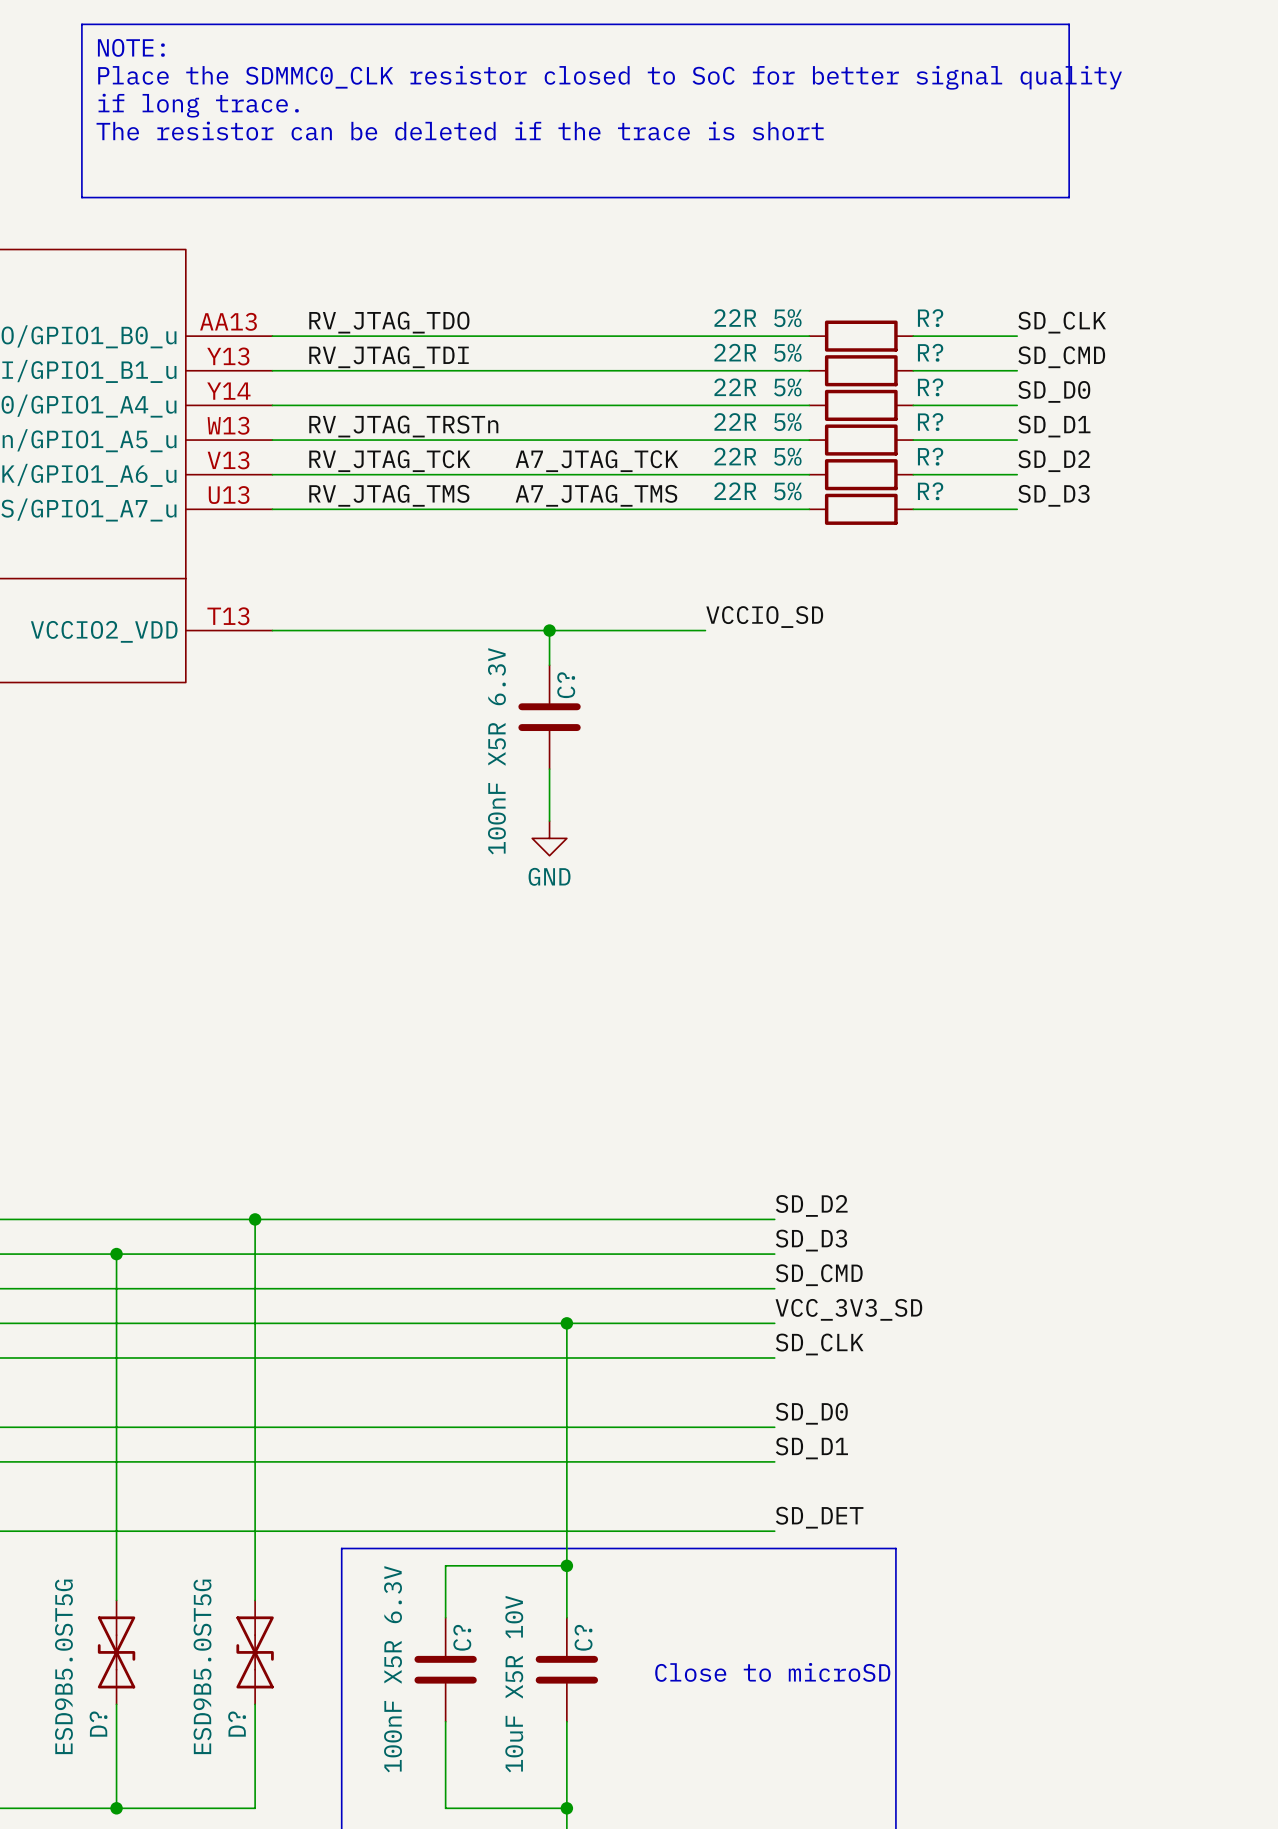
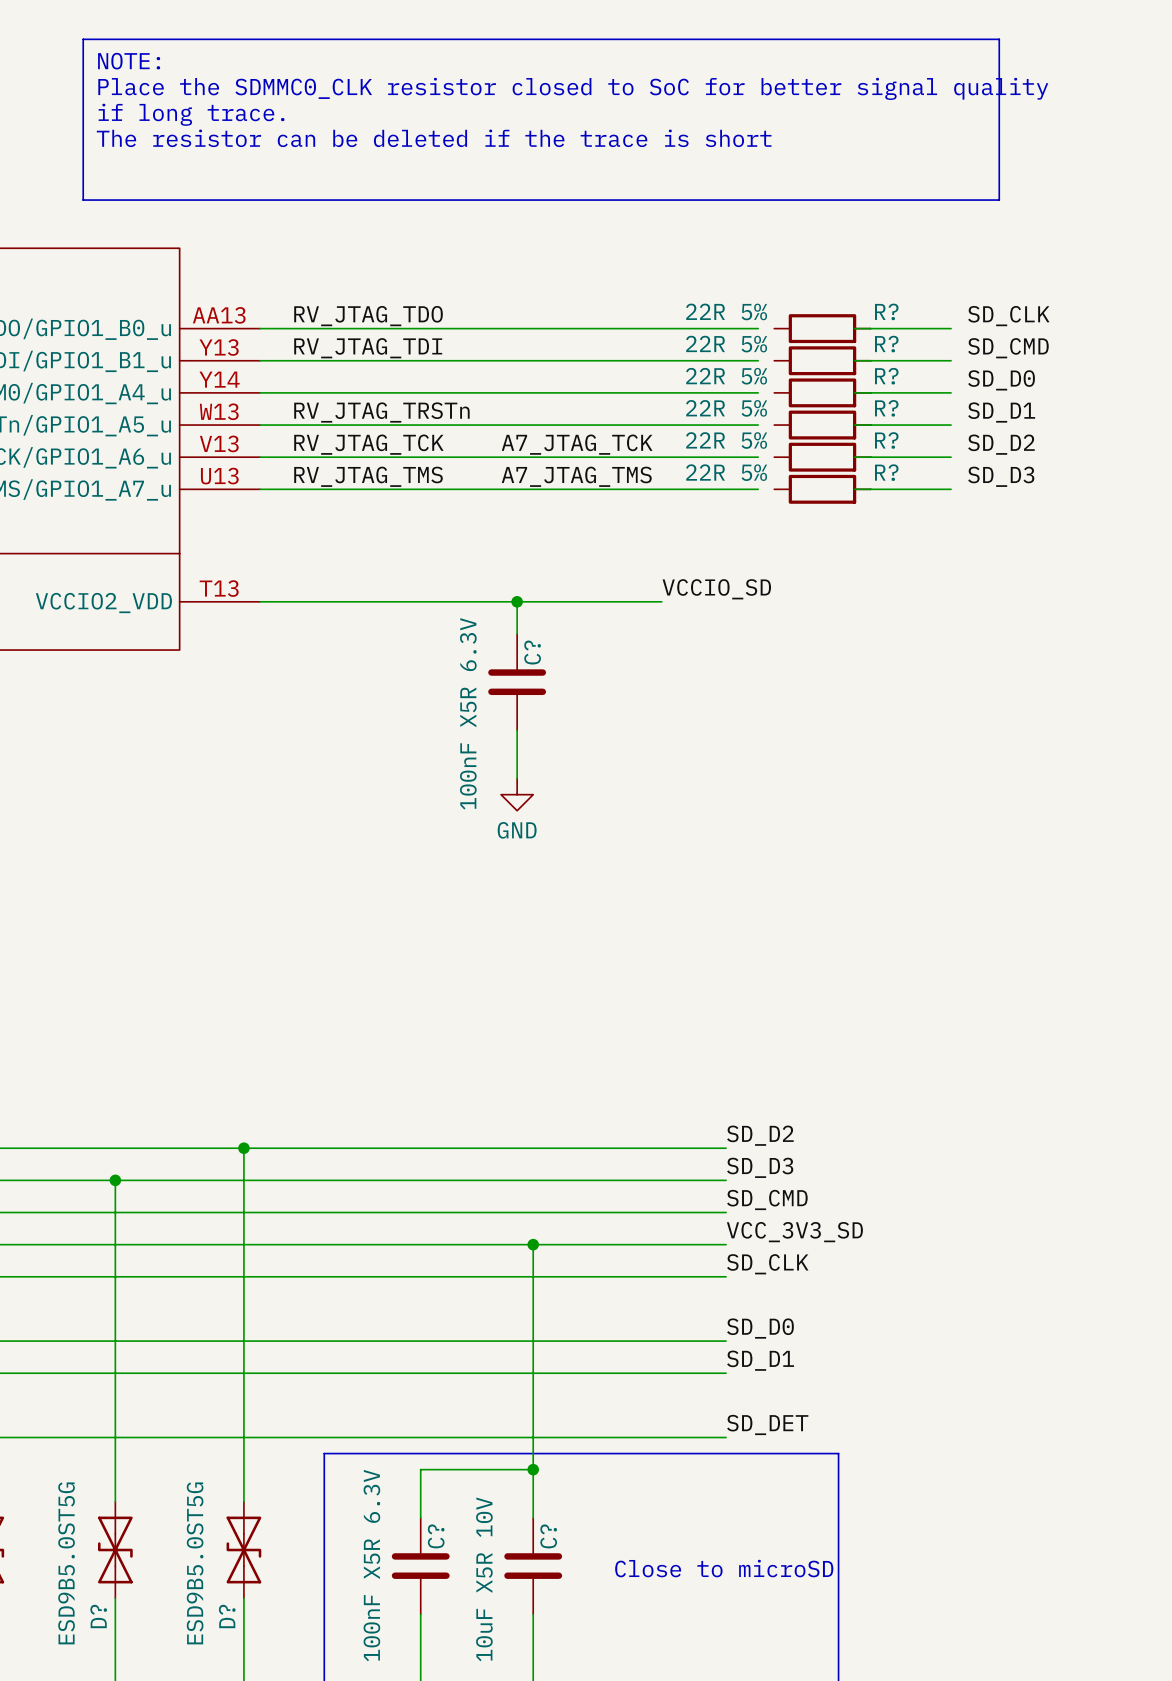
label position: SD_CLK (1062, 322) -> SD_CLK (1008, 316)
R? position: (861, 336) -> (822, 328)
label position: SD_CMD (1061, 357) -> SD_CMD (1008, 348)
R? position: (861, 370) -> (822, 360)
label position: SD_D0 (1054, 391) -> SD_D0 (1001, 380)
R? position: (861, 405) -> (822, 392)
label position: SD_D1 (1054, 426) -> SD_D1 (1001, 412)
R? position: (861, 440) -> (822, 425)
label position: A7_JTAG_TCK (596, 461) -> A7_JTAG_TCK (577, 444)
label position: SD_D2 (1054, 461) -> SD_D2 (1001, 444)
R? position: (861, 474) -> (822, 457)
label position: A7_JTAG_TMS (596, 495) -> A7_JTAG_TMS (576, 476)
label position: SD_D3 (1053, 495) -> SD_D3 (1001, 476)
R? position: (861, 509) -> (822, 489)

